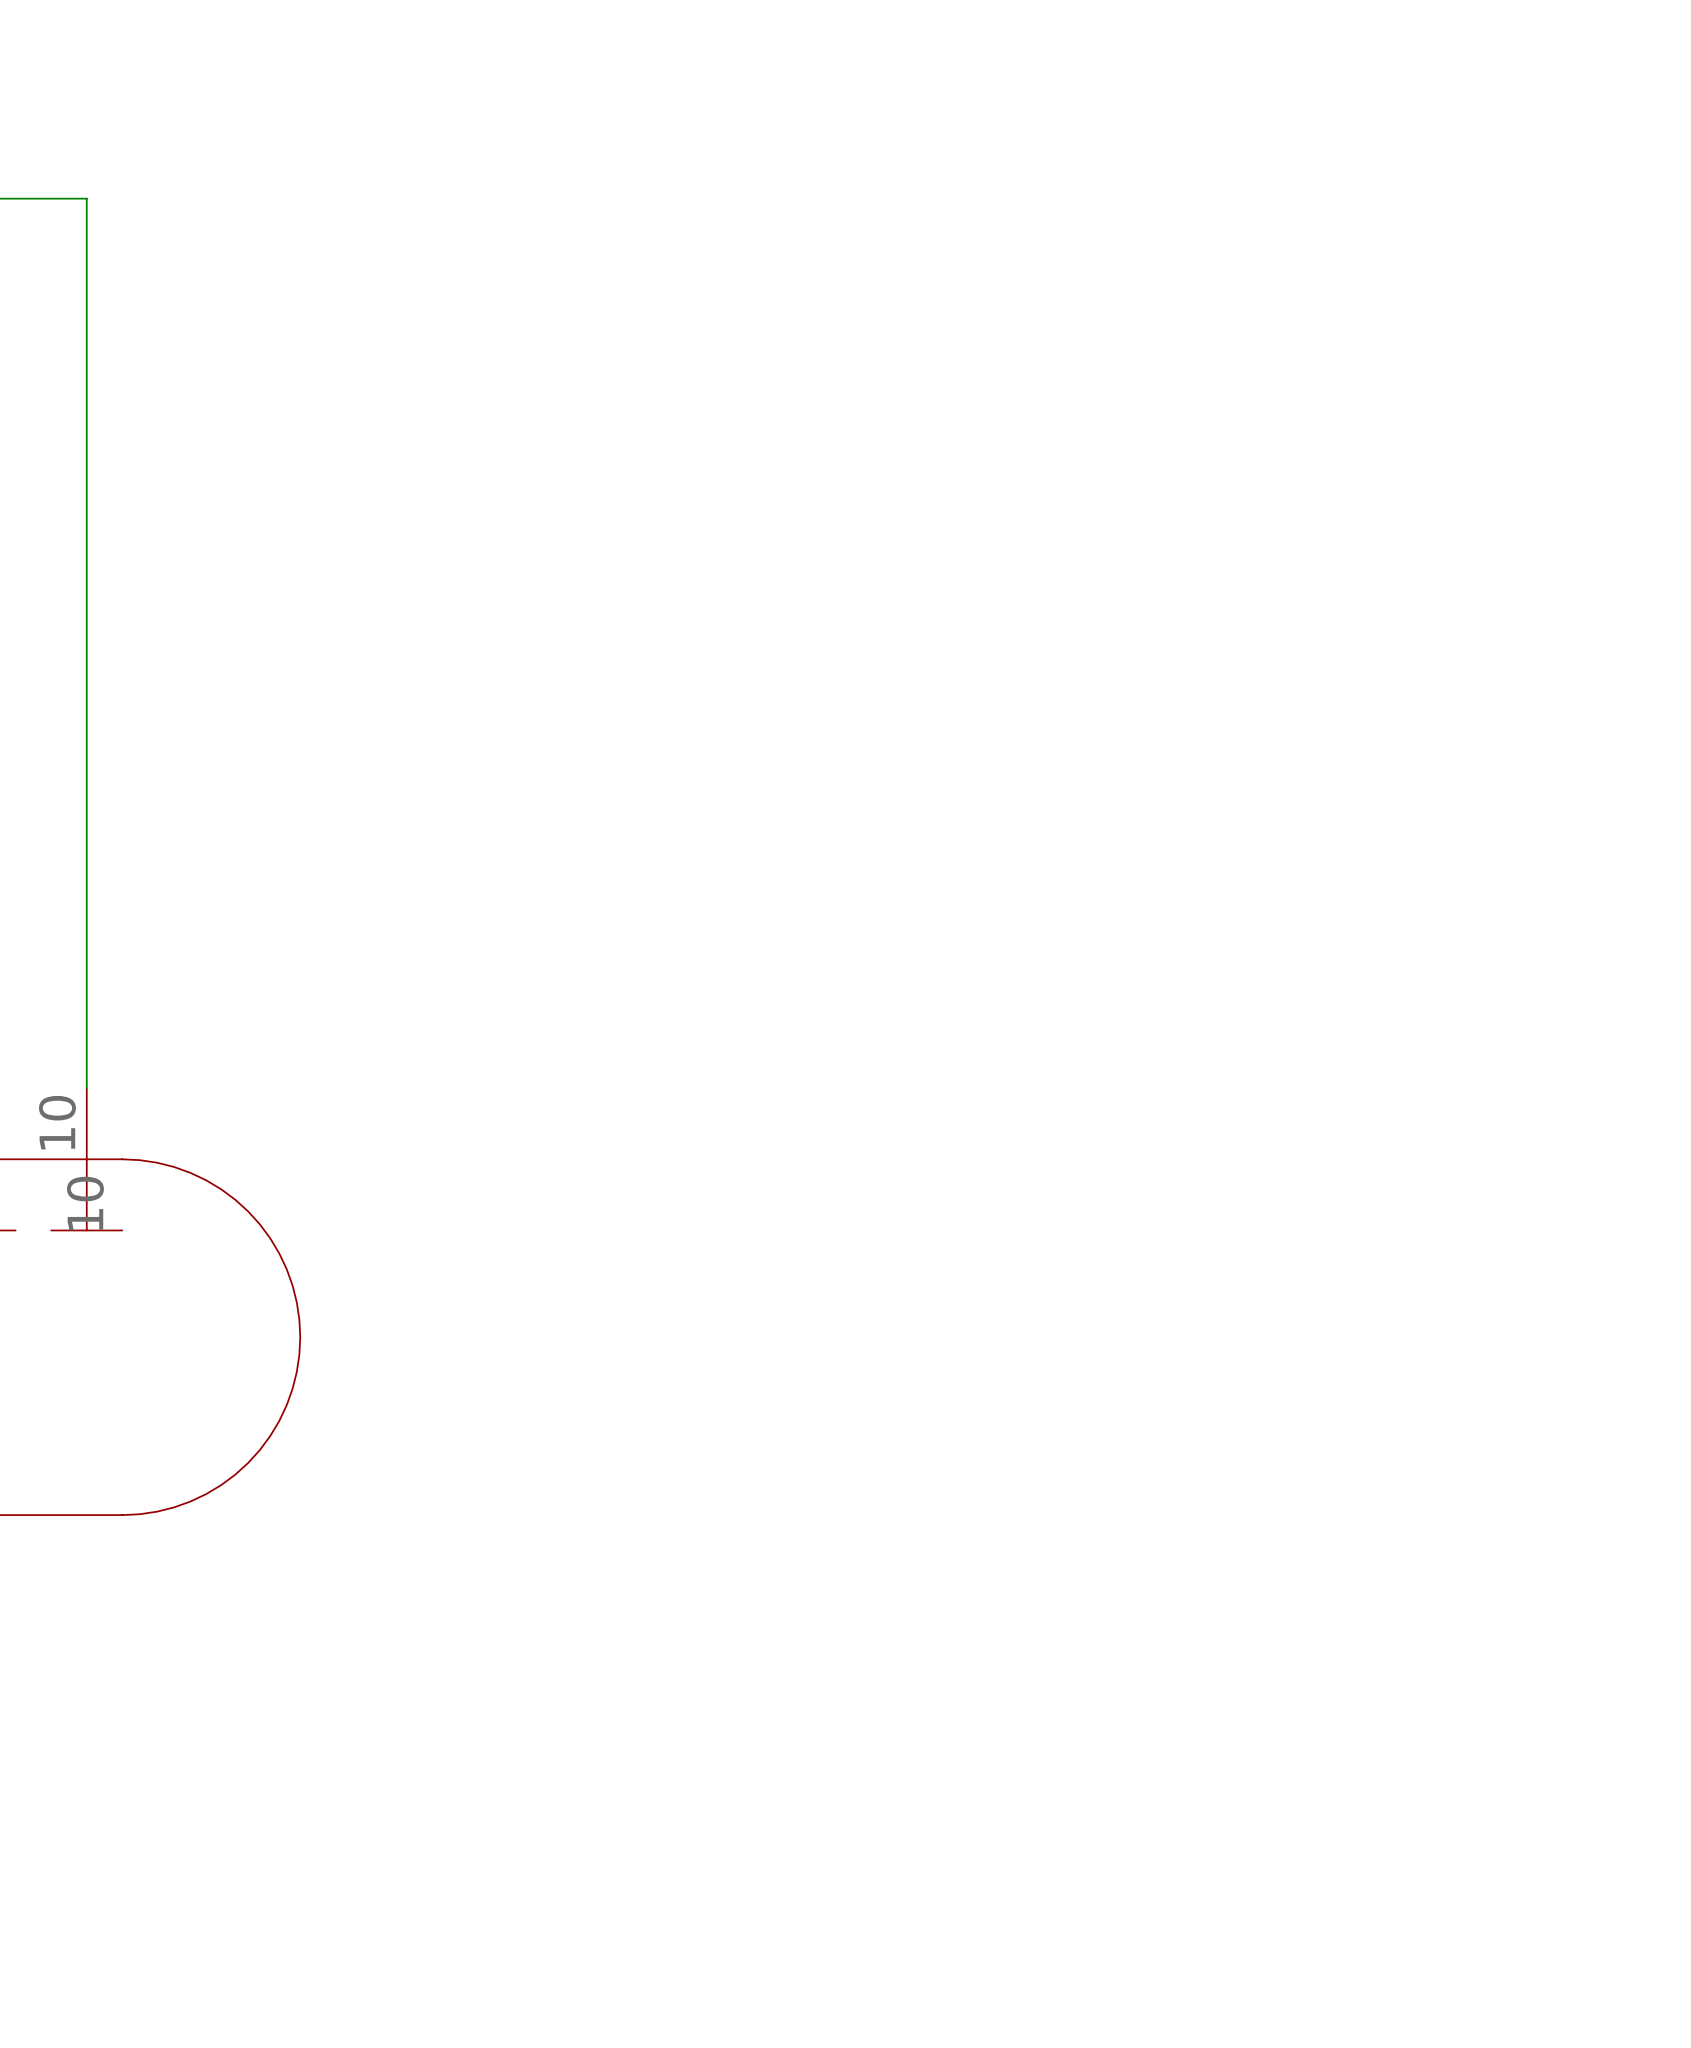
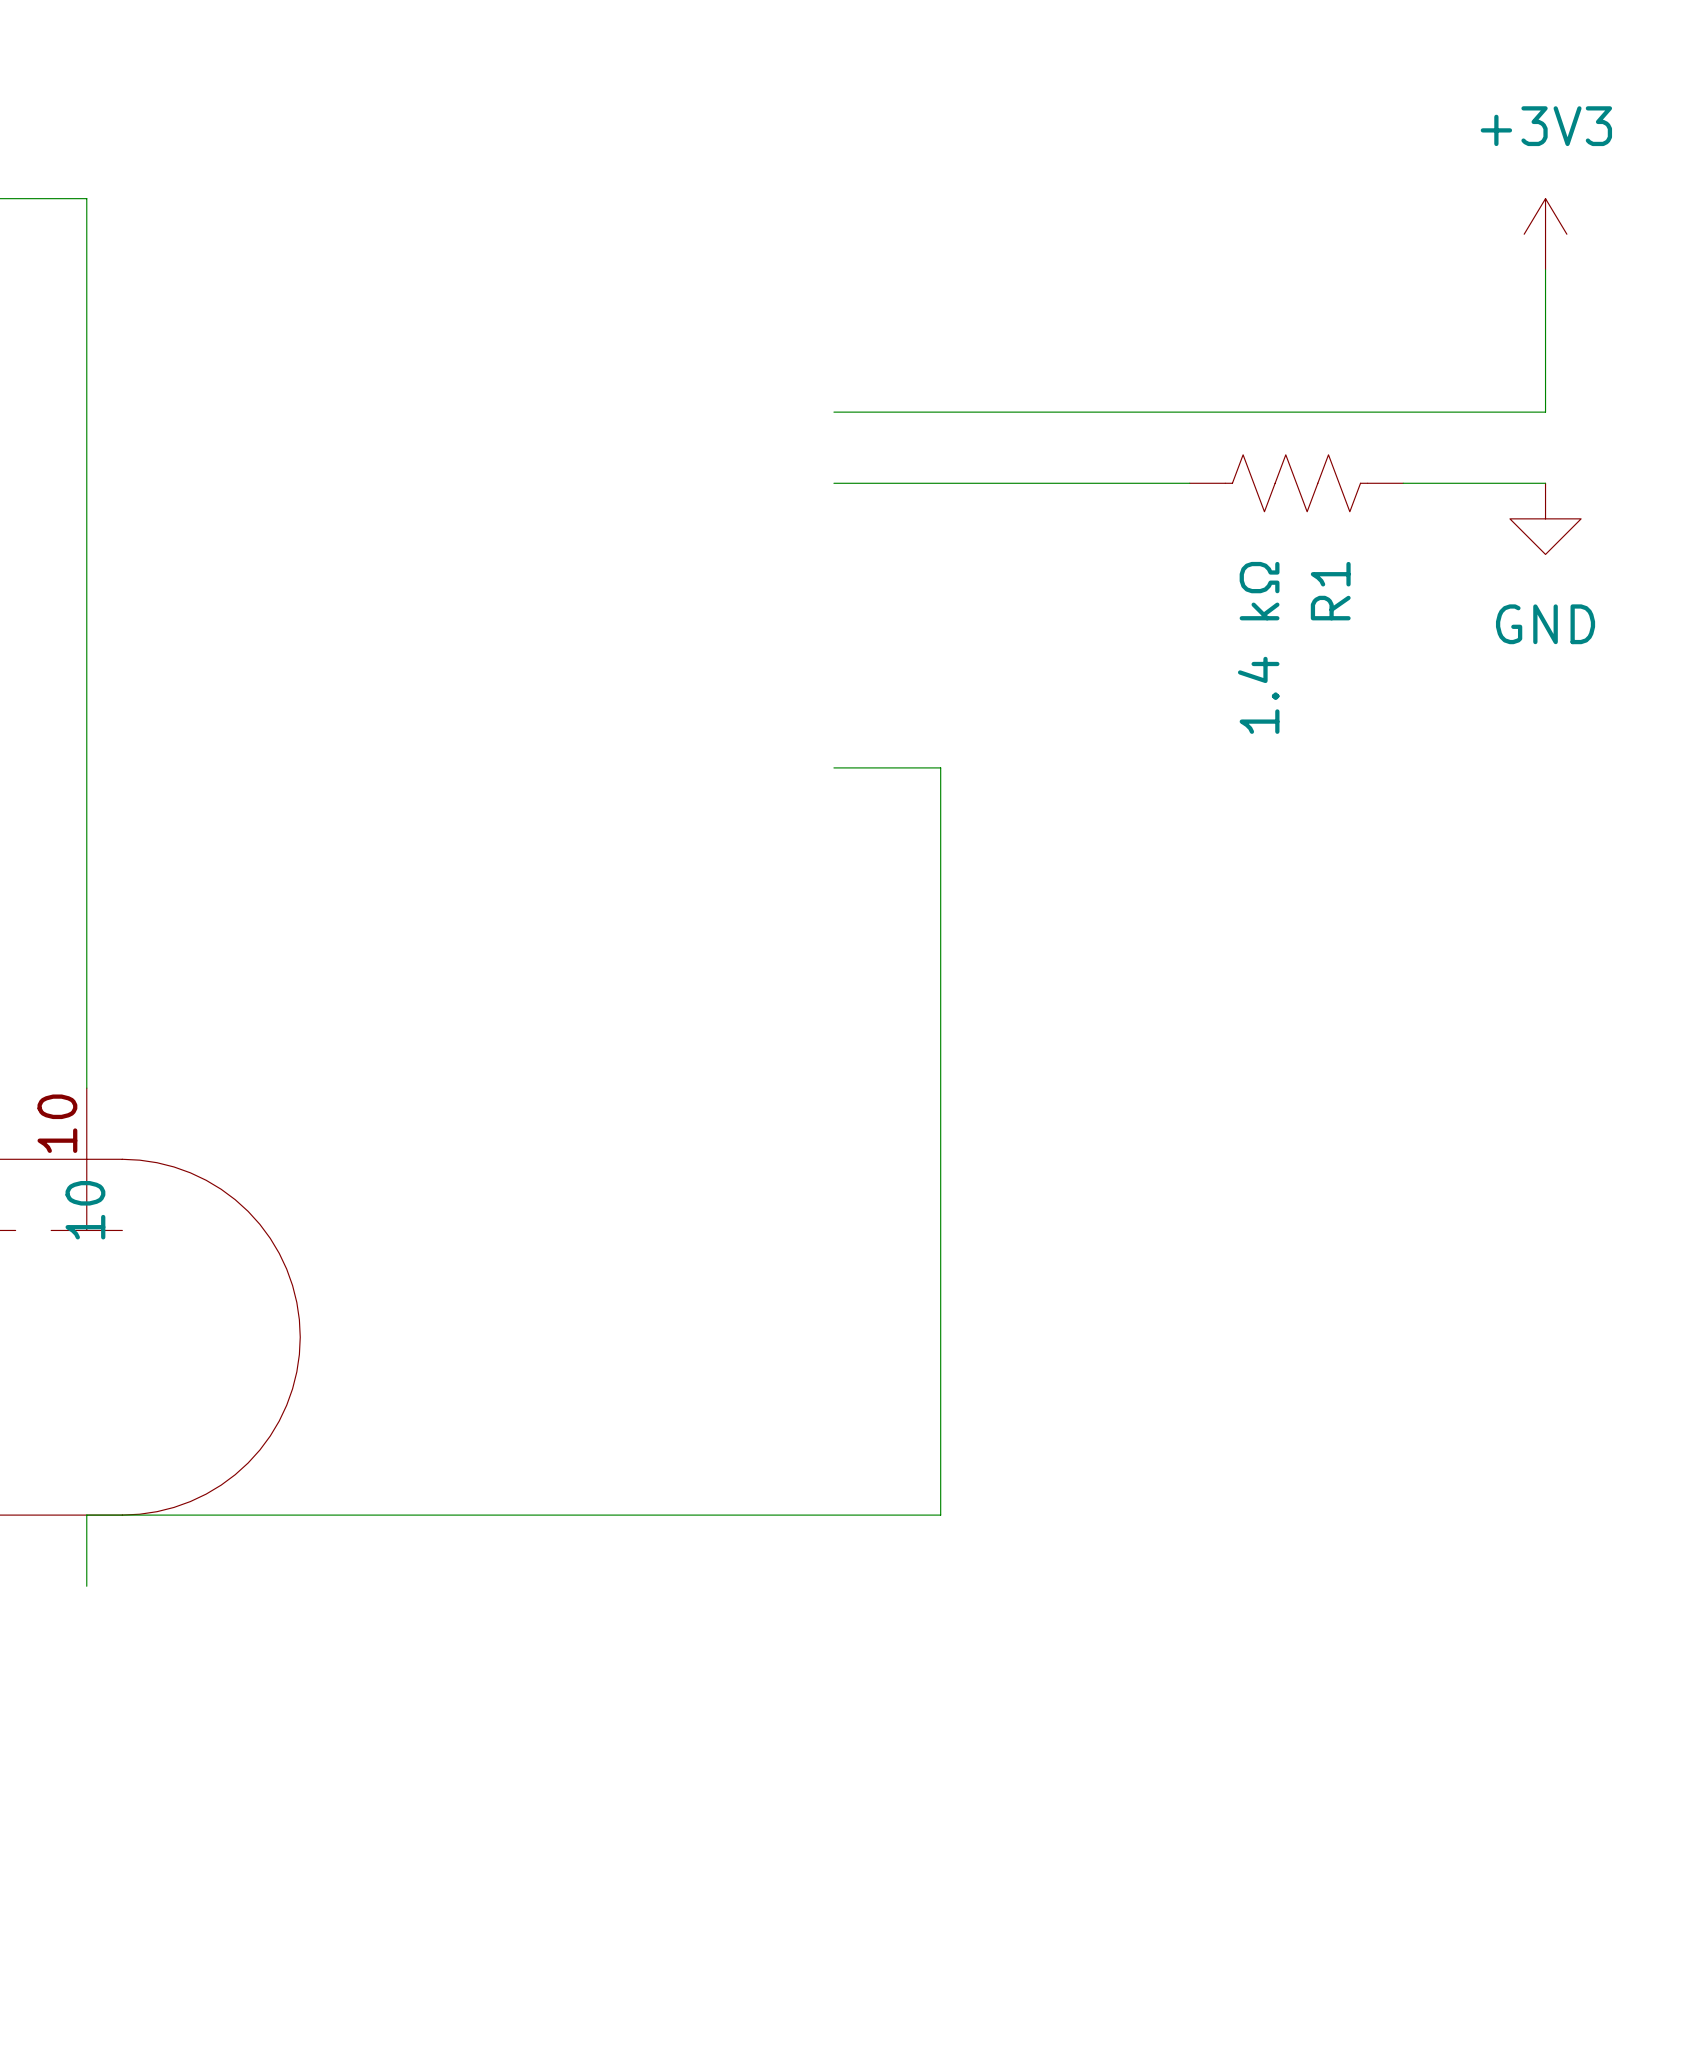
power symbol: none -> +3V3 (1545, 234)
wire: none -> (1545, 269) (1545, 412) (833, 412)
wire: none -> (833, 483) (1189, 483)
R1: none -> 1.4 kΩ (1296, 483)
wire: none -> (1403, 483) (1545, 483)
power symbol: none -> GND (1545, 518)
wire: none -> (833, 767) (940, 767) (940, 1515) (86, 1515) (86, 1586)

